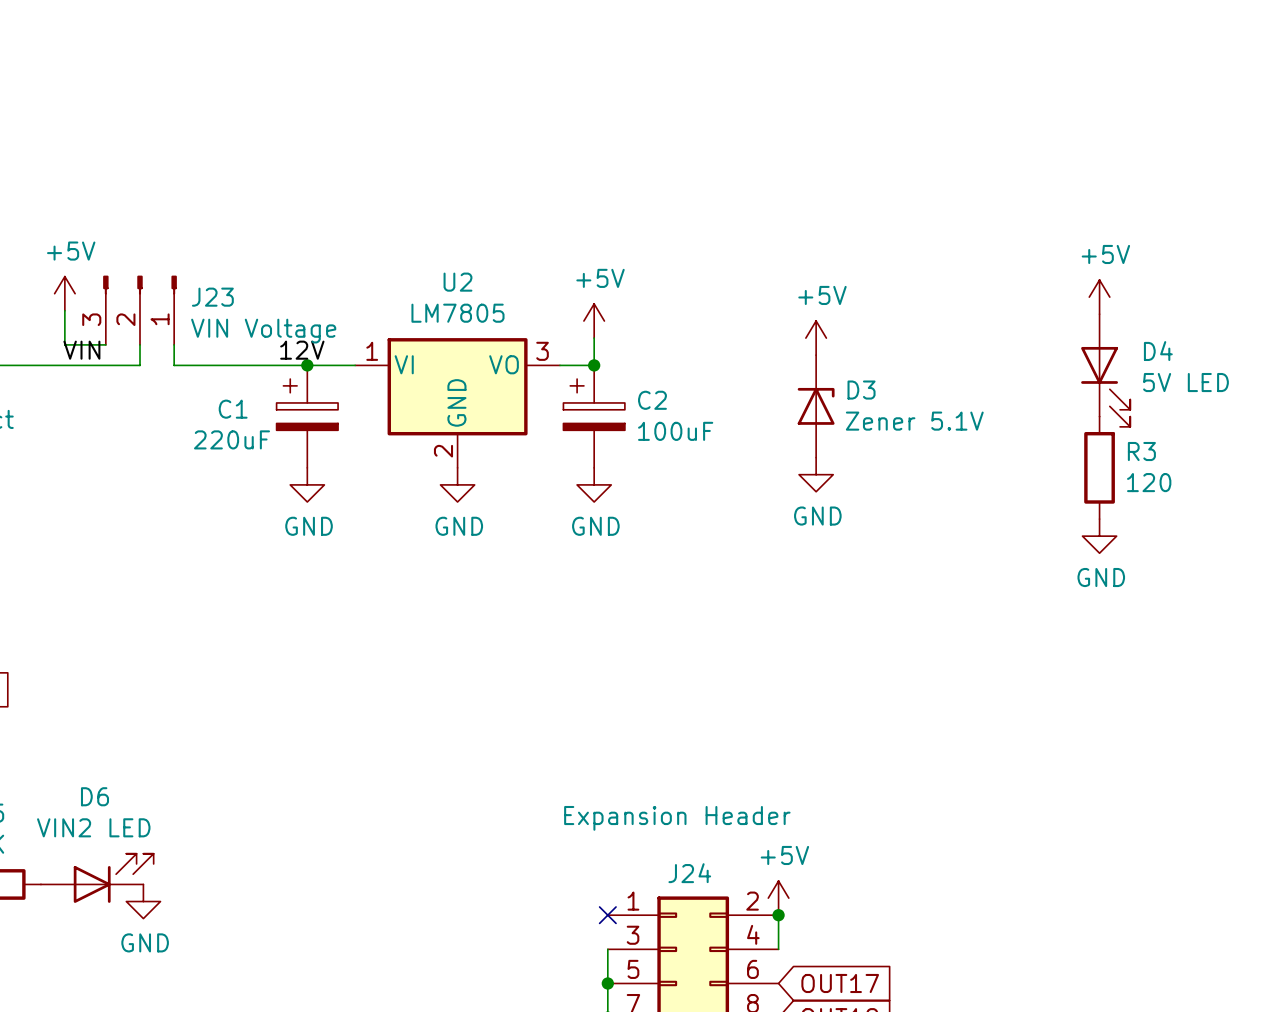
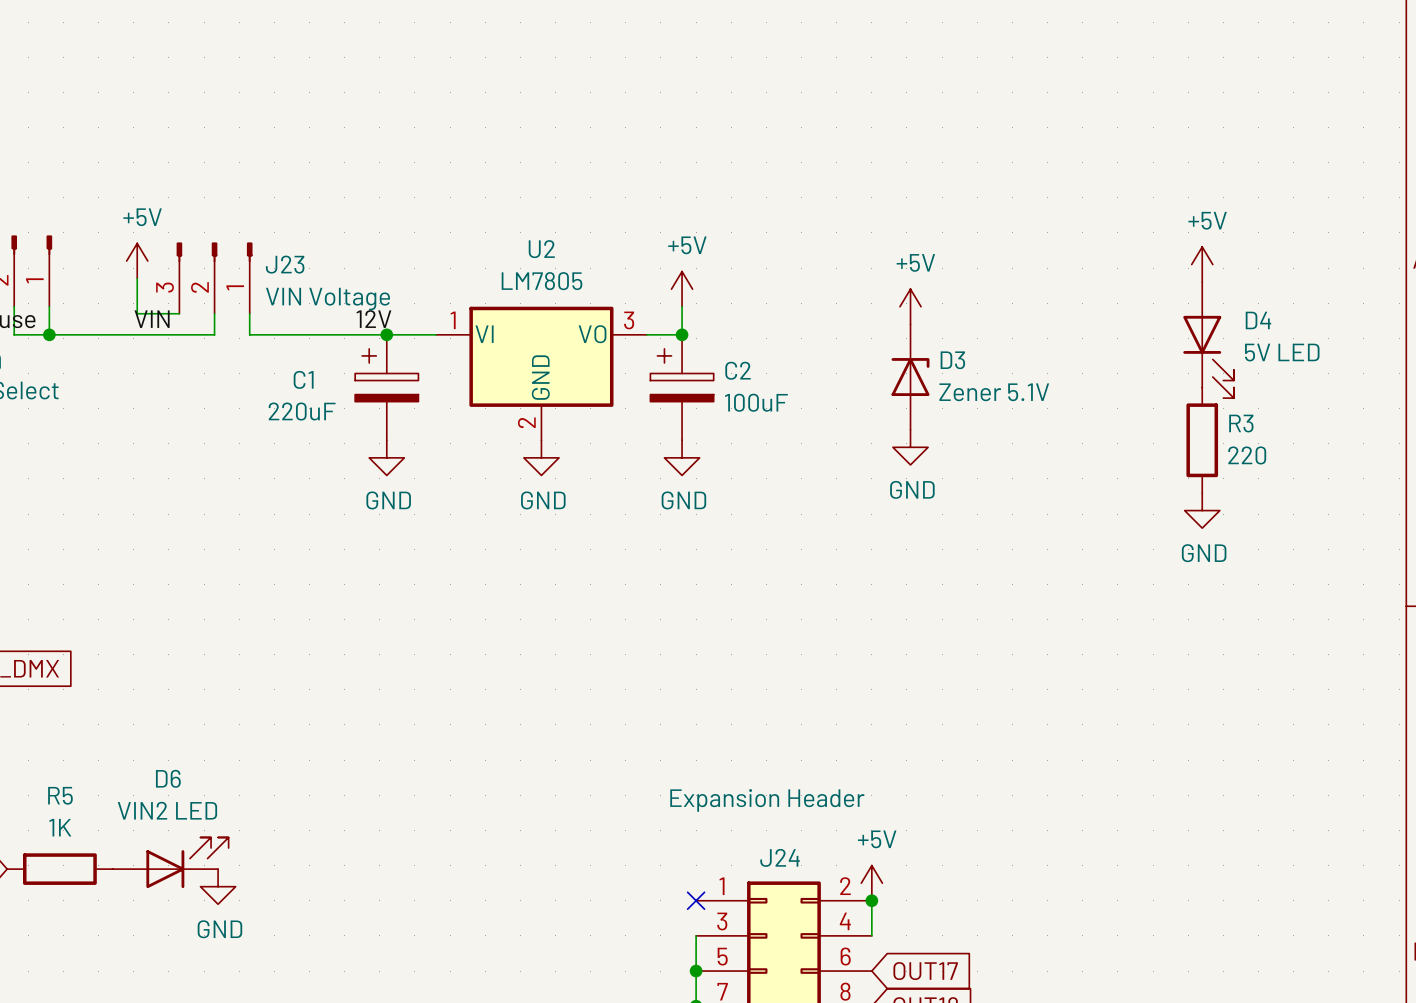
R3 value: 120 (1149, 482) -> 220 (1247, 455)

